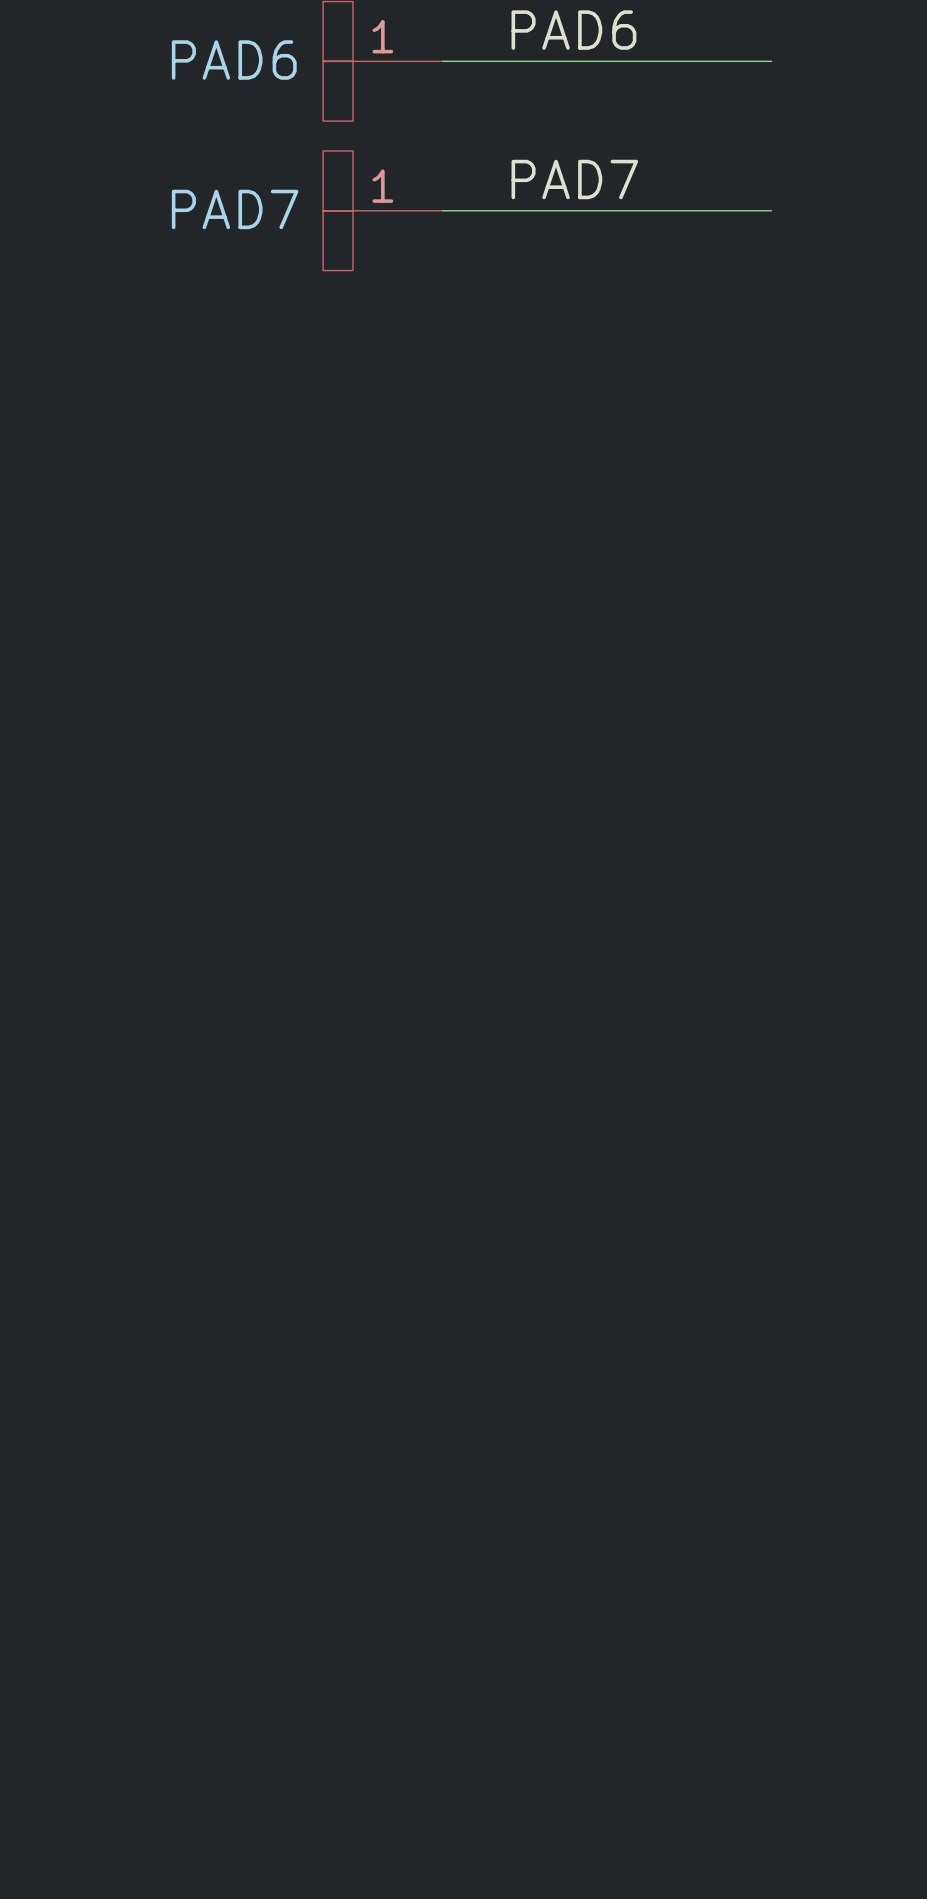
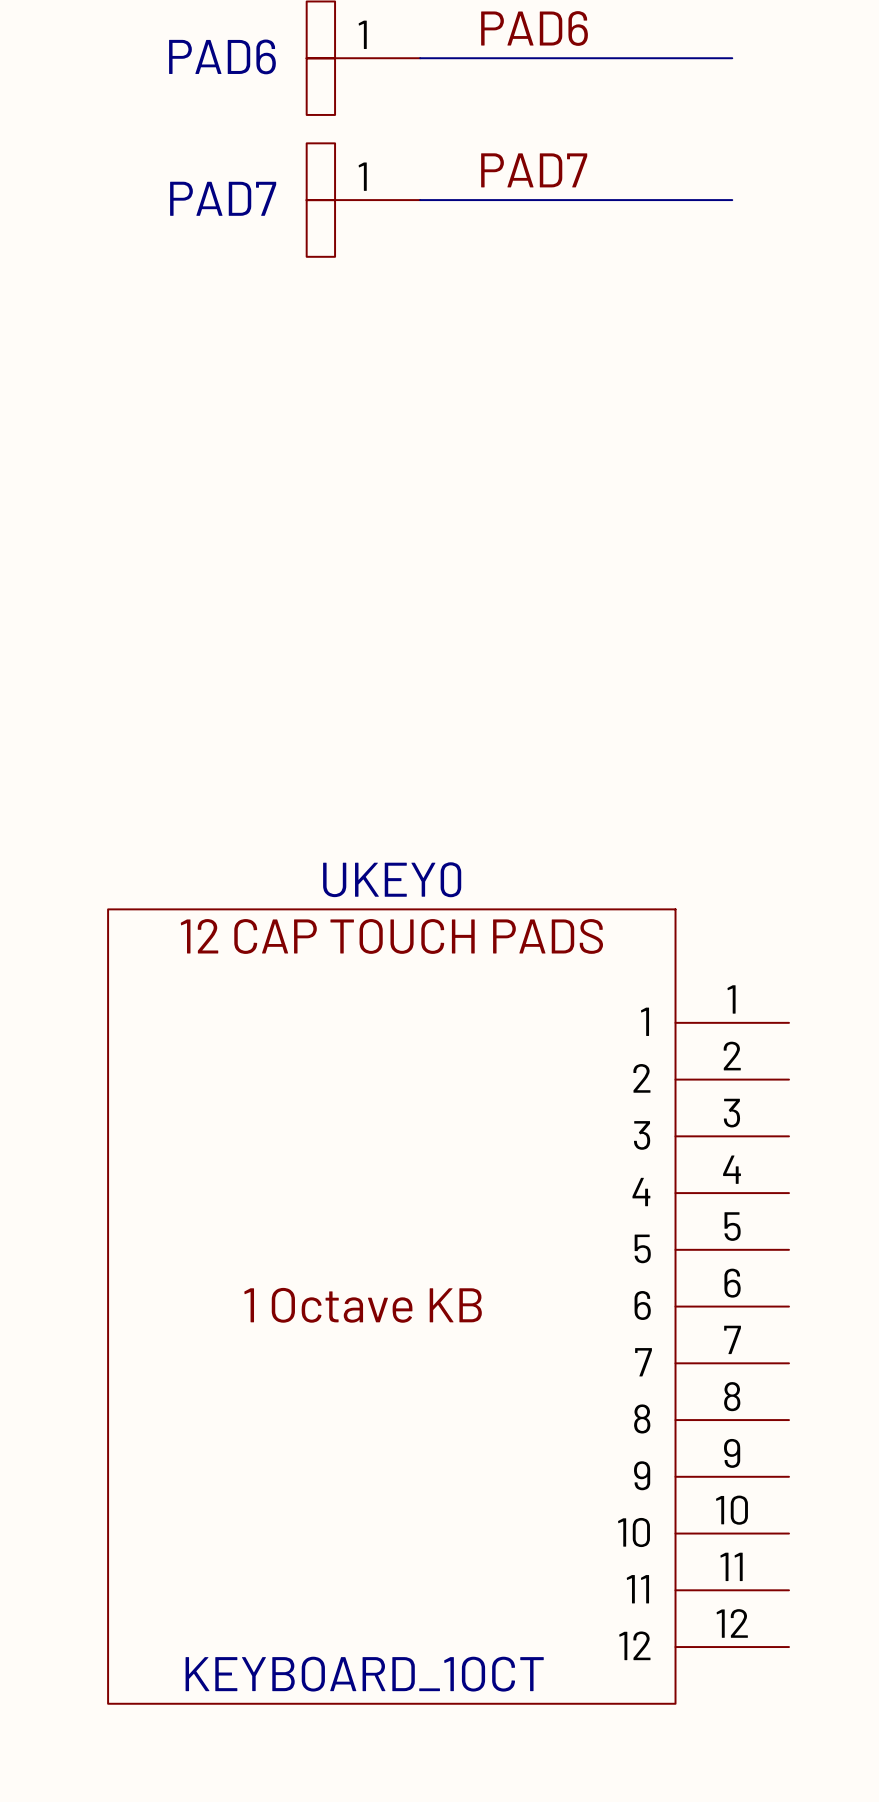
UKEY0: none -> KEYBOARD_1OCT (448, 1306)

